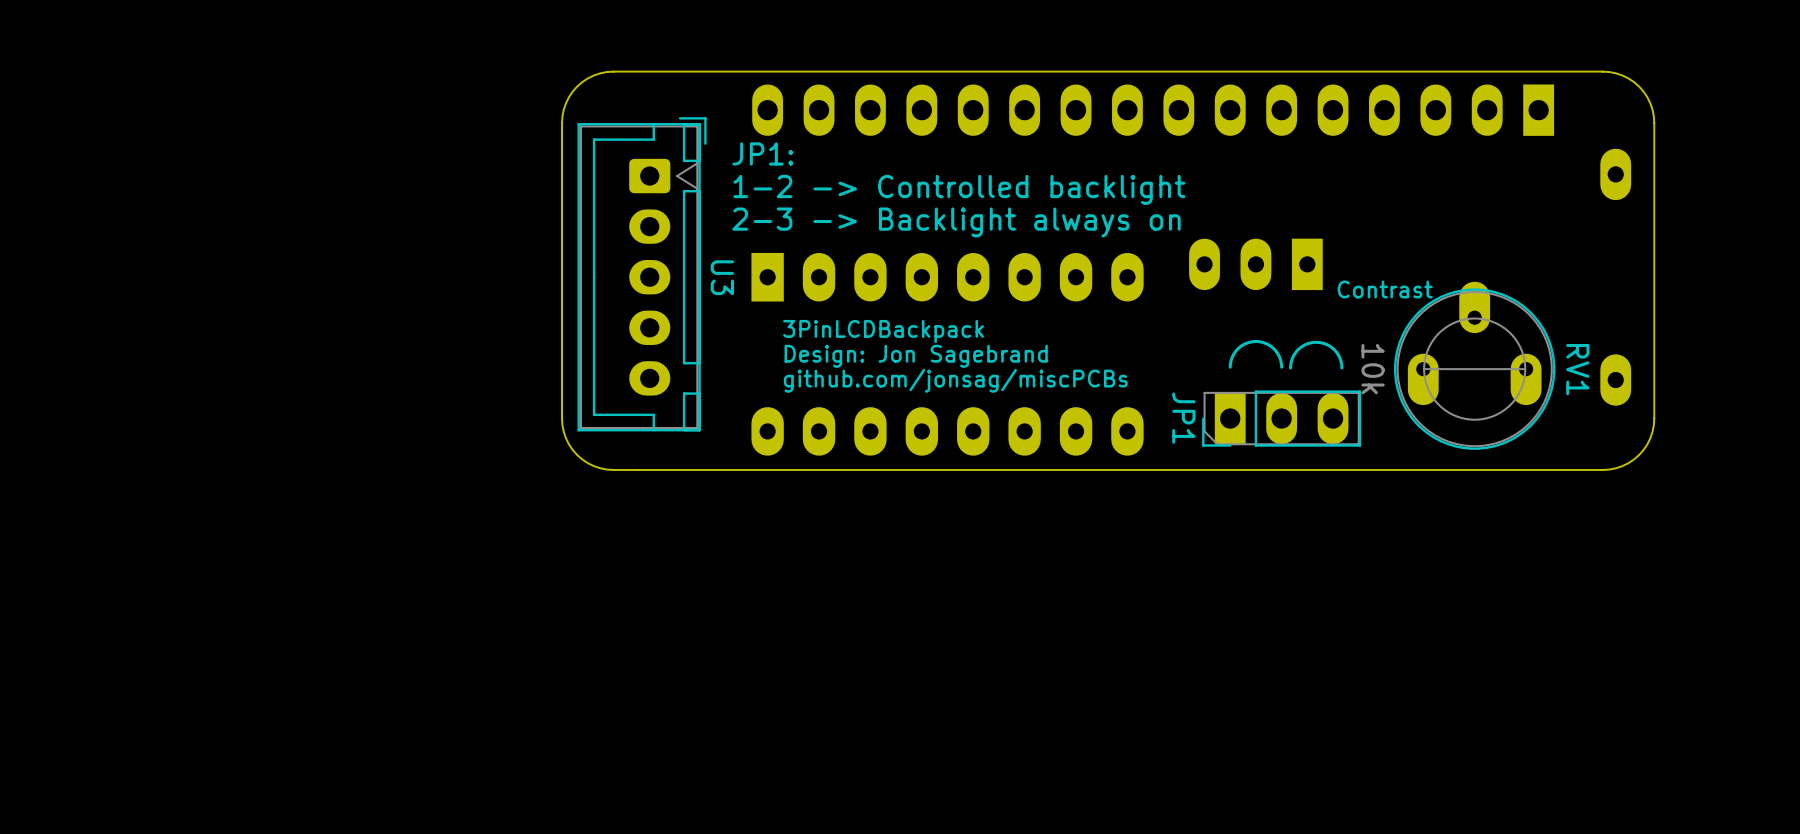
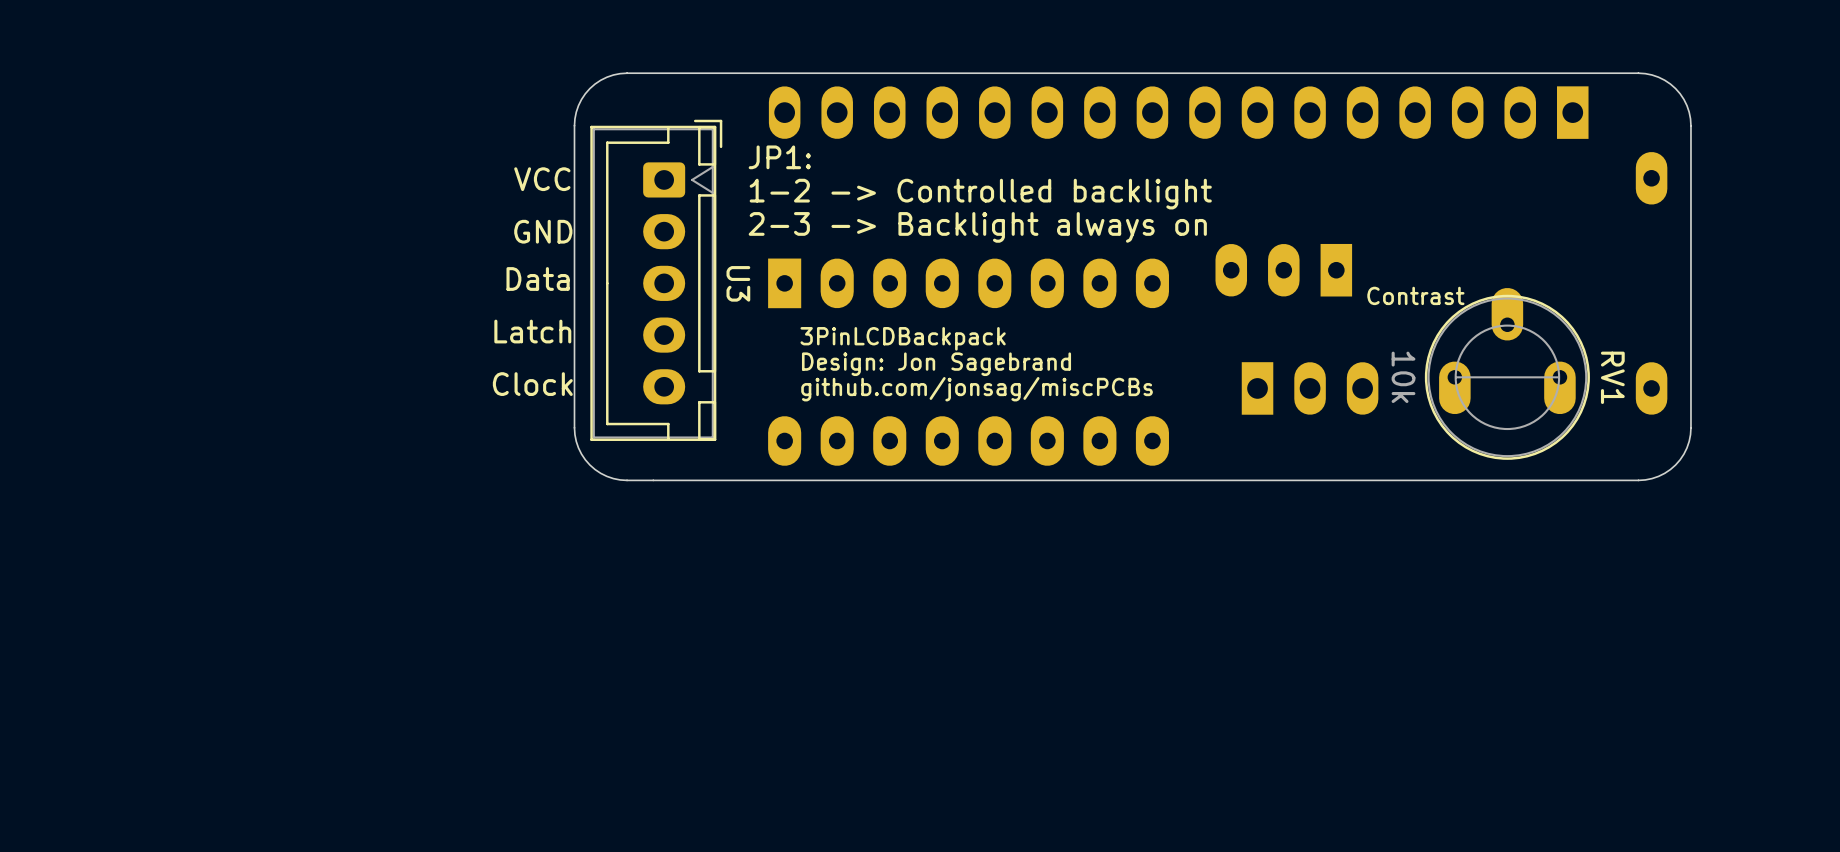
U3 text: none -> VCC (542, 179)
U3 text: none -> GND (543, 231)
U3 text: none -> Data (538, 278)
U3 text: none -> Latch (532, 331)
U3 text: none -> Clock (532, 384)
part: none -> (1310, 388)
JP1: (1281, 393) -> none

